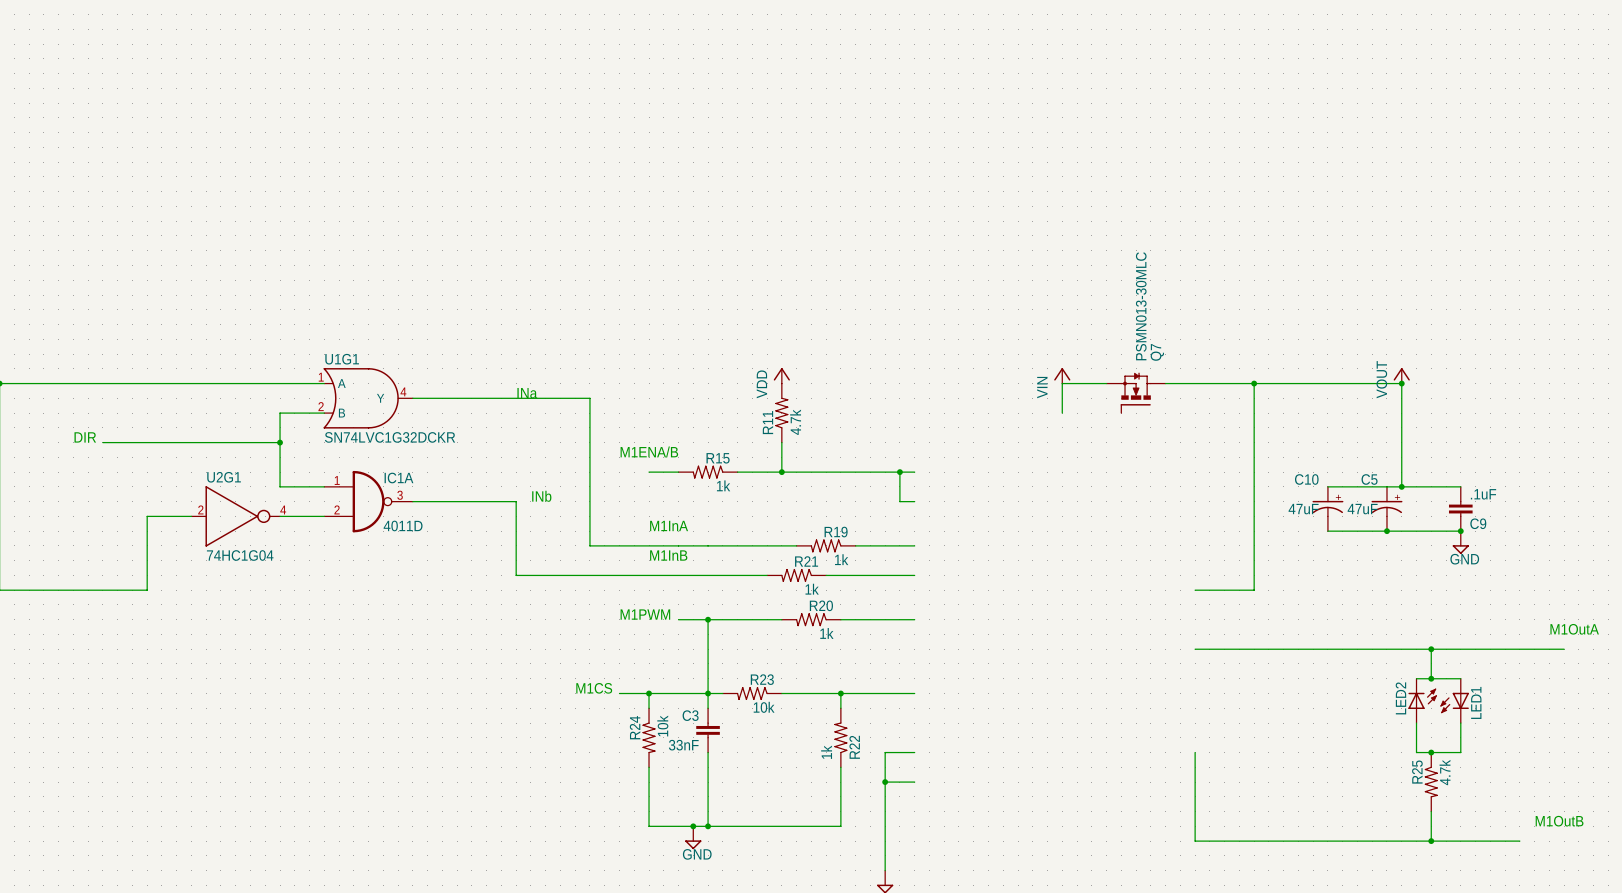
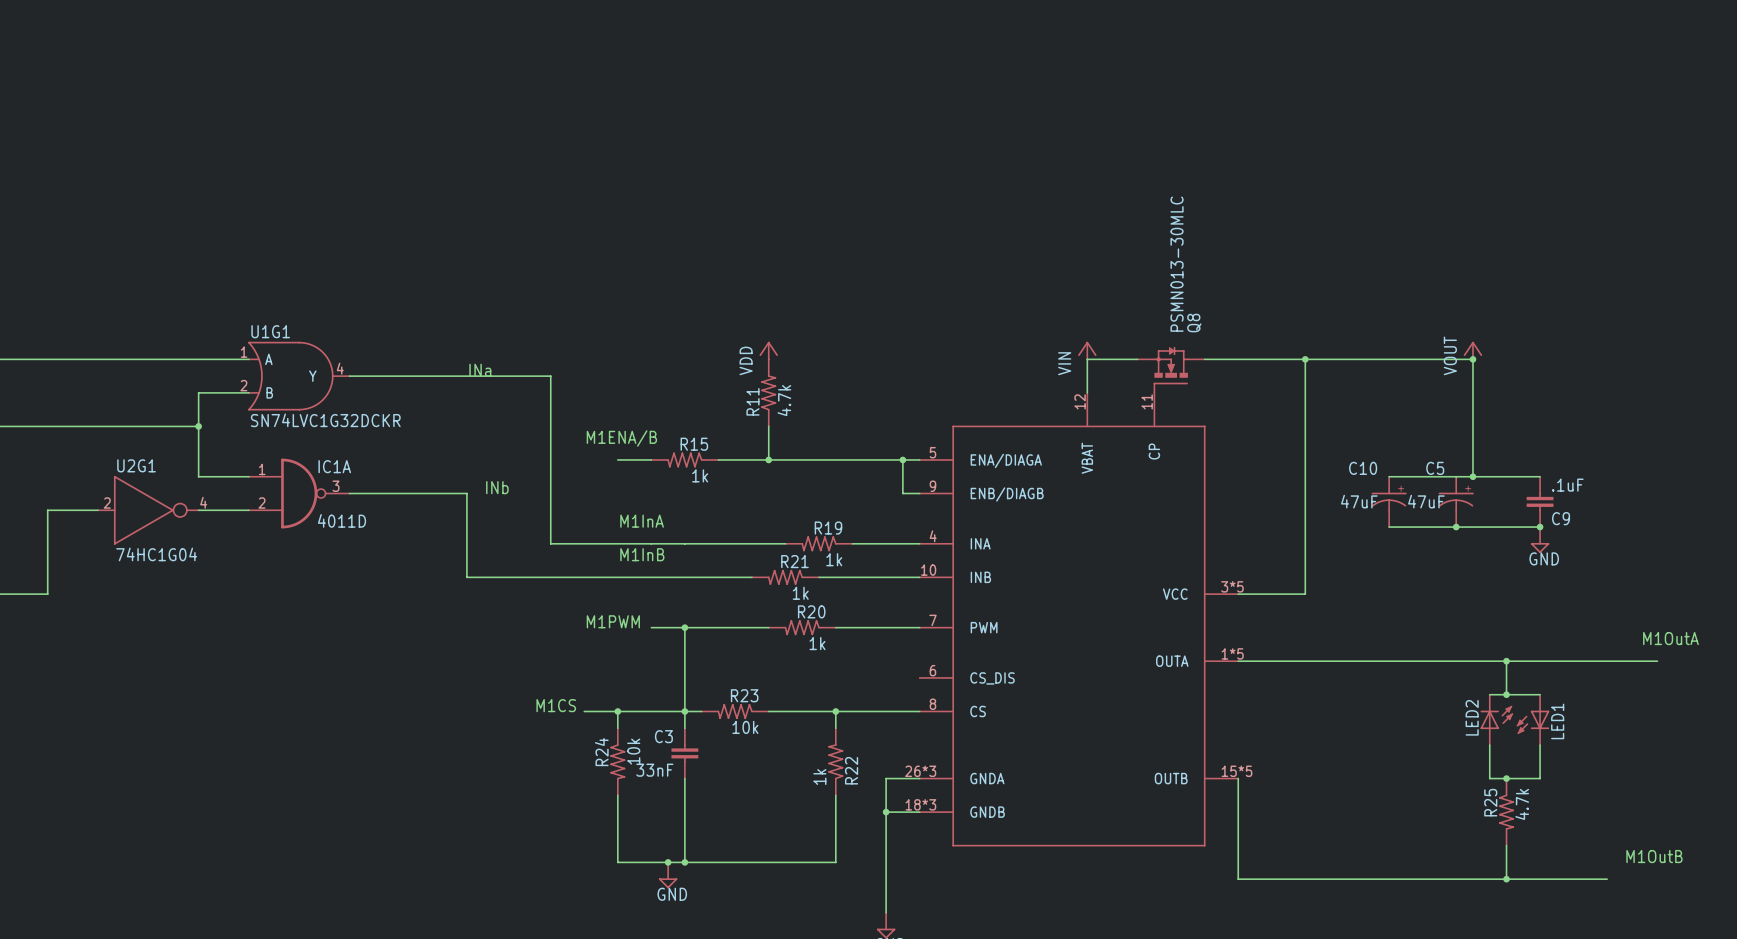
Q7 name: Q7 (1157, 352) -> Q8 (1194, 323)
part: none -> (1078, 619)

